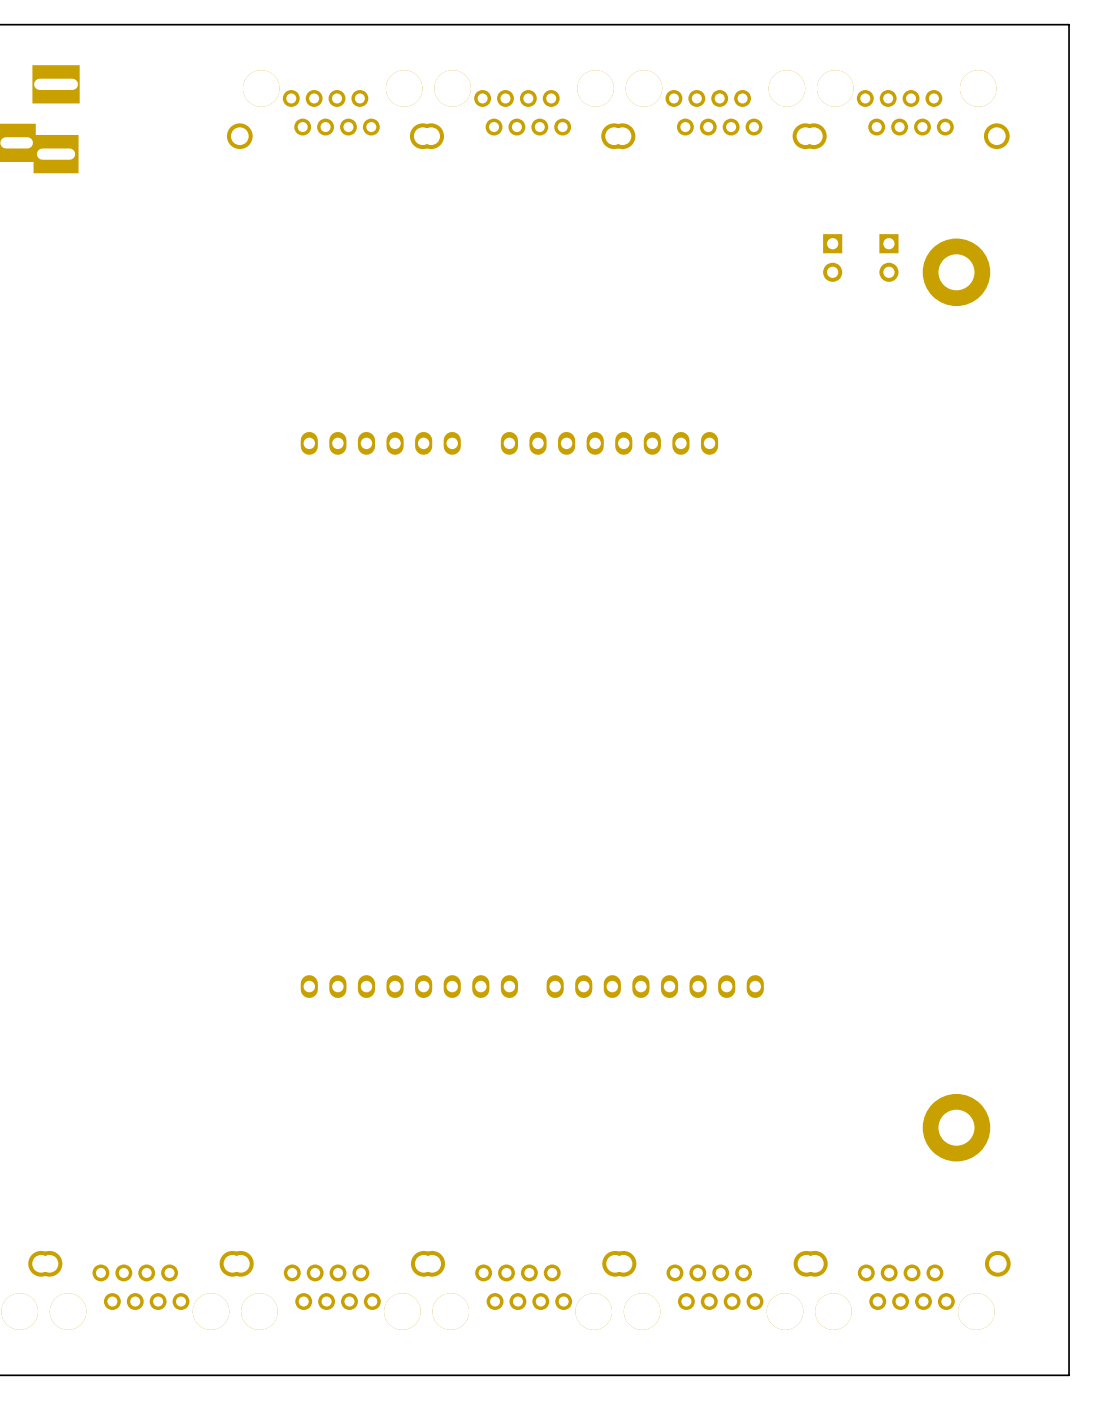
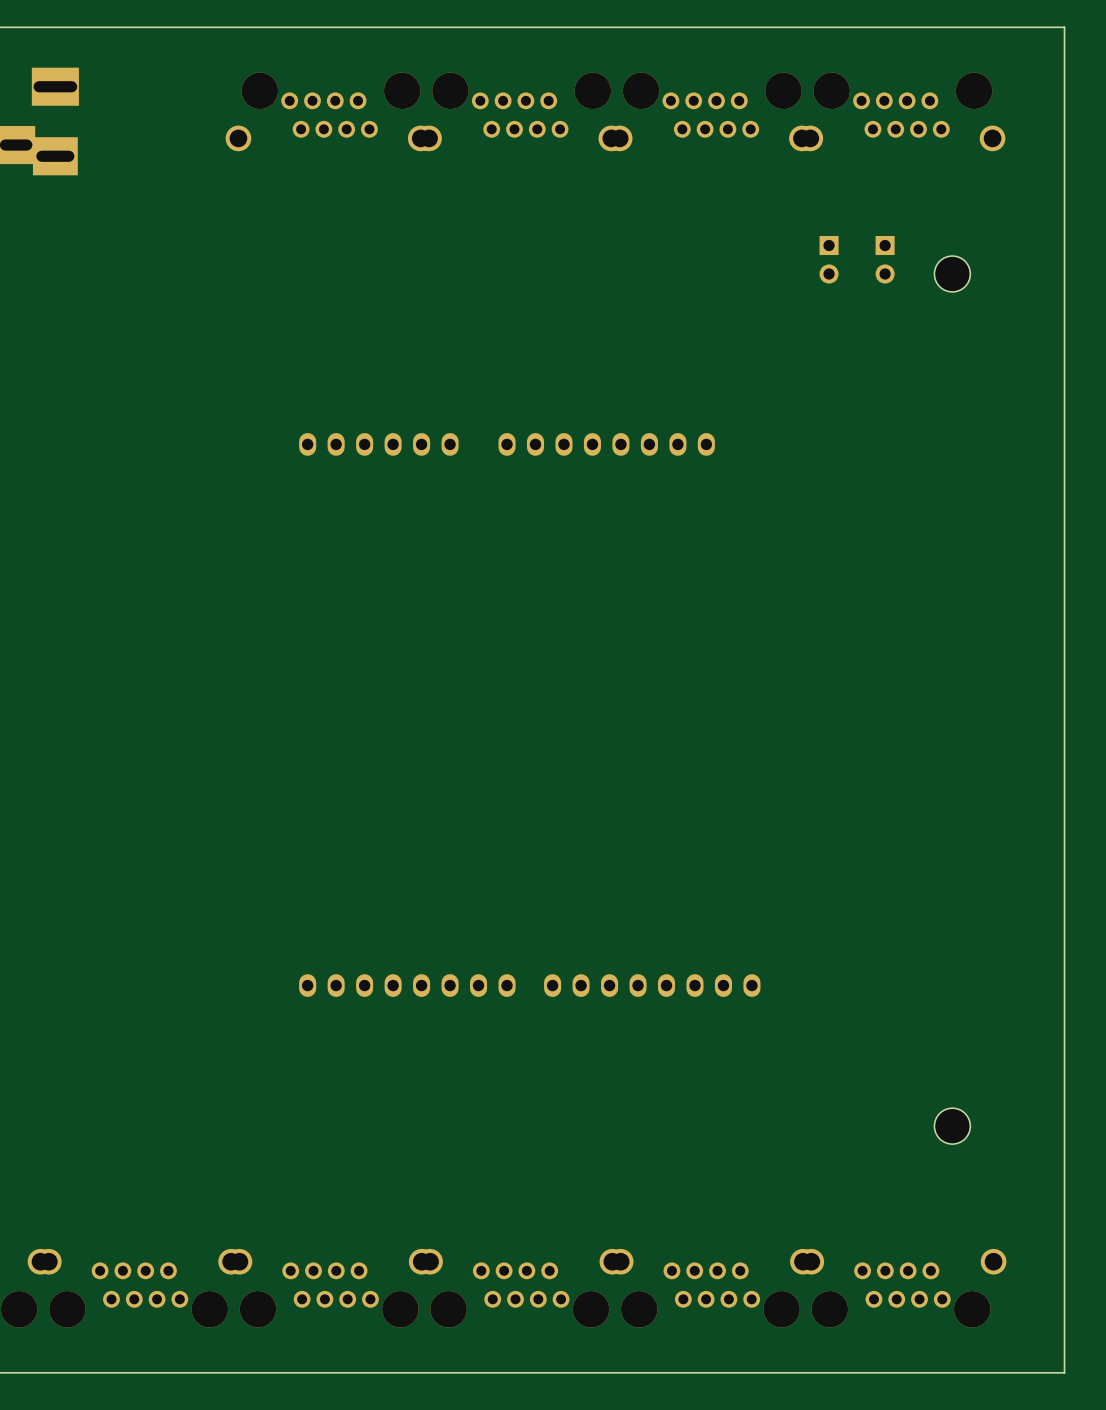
part footprint: [922, 238, 991, 307] -> [934, 256, 971, 292]
part footprint: [922, 1093, 991, 1162] -> [934, 1108, 971, 1145]

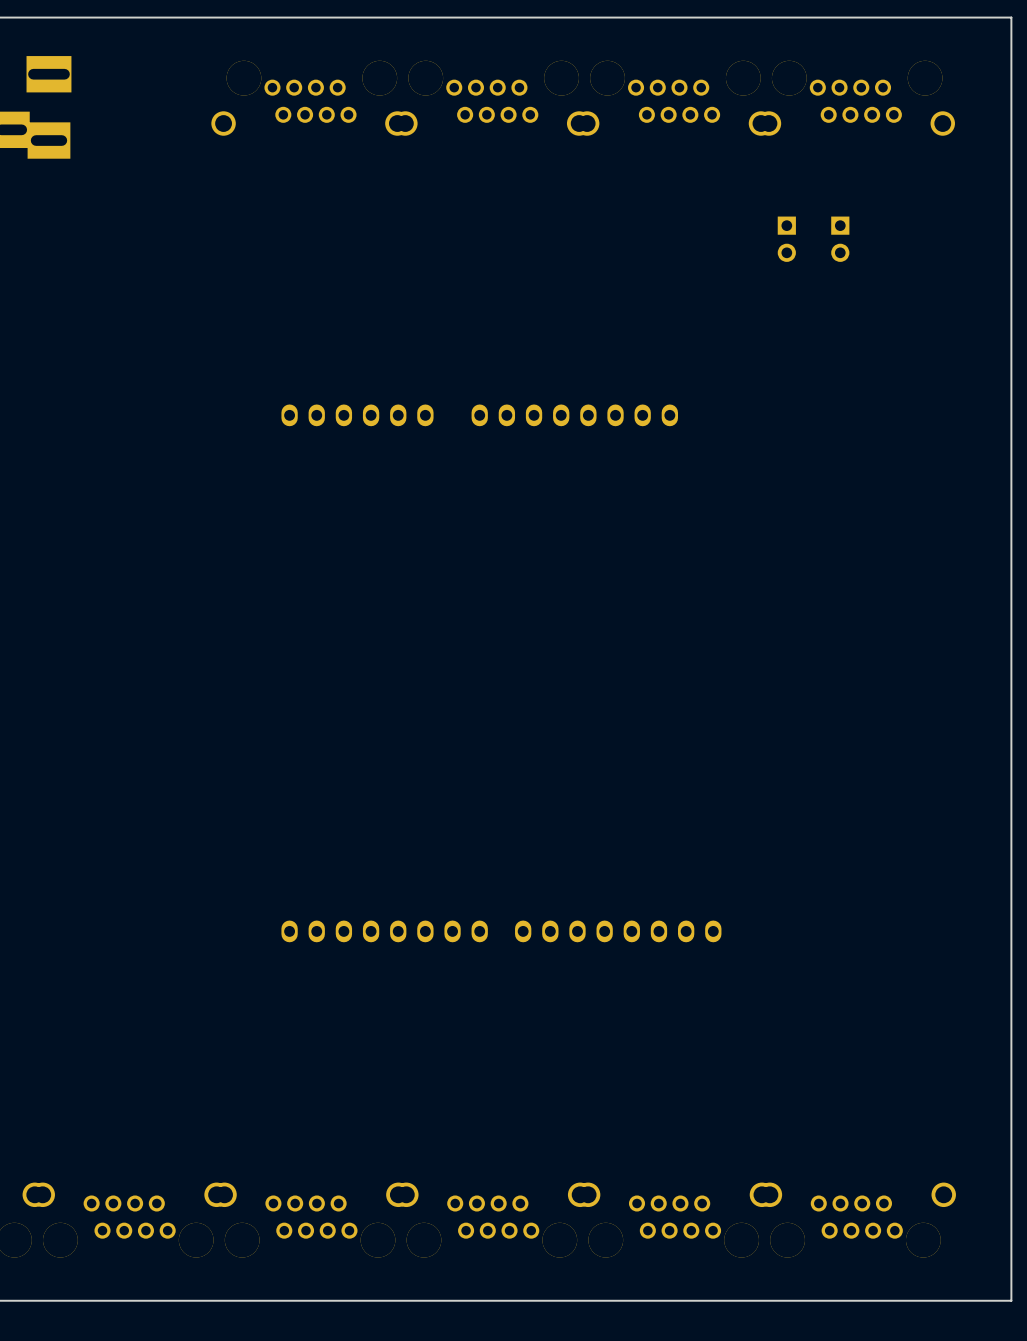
part: (952, 273) -> none
part: (952, 1126) -> none

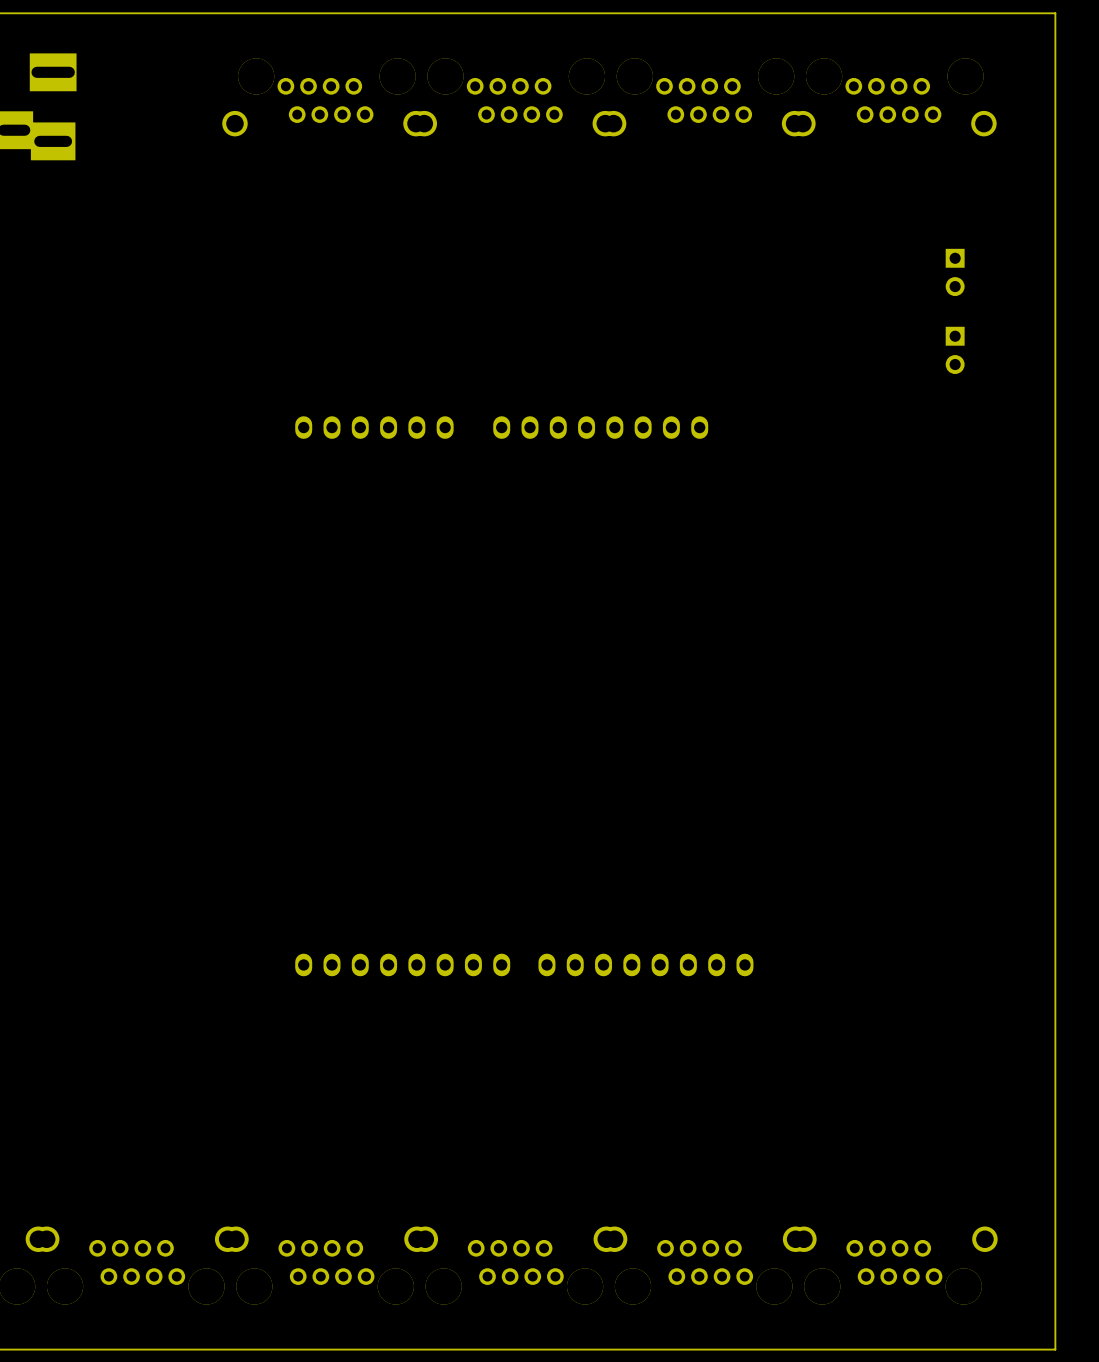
part: (786, 239) -> none
part: (840, 239) -> none
part: none -> (955, 272)
part: none -> (955, 350)

